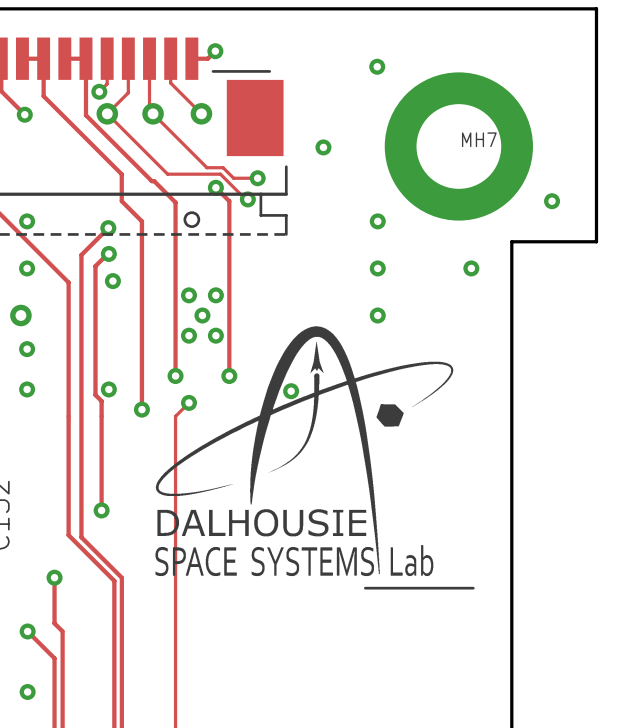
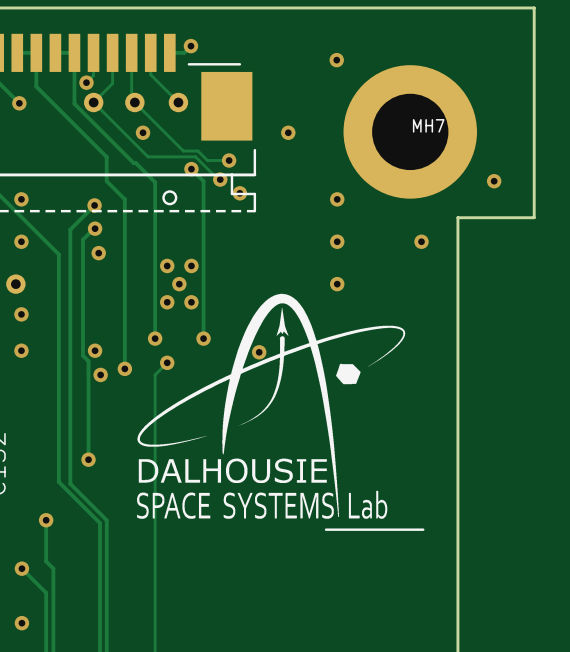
via: none -> (143, 132)
via: none -> (239, 193)
via: none -> (100, 374)

